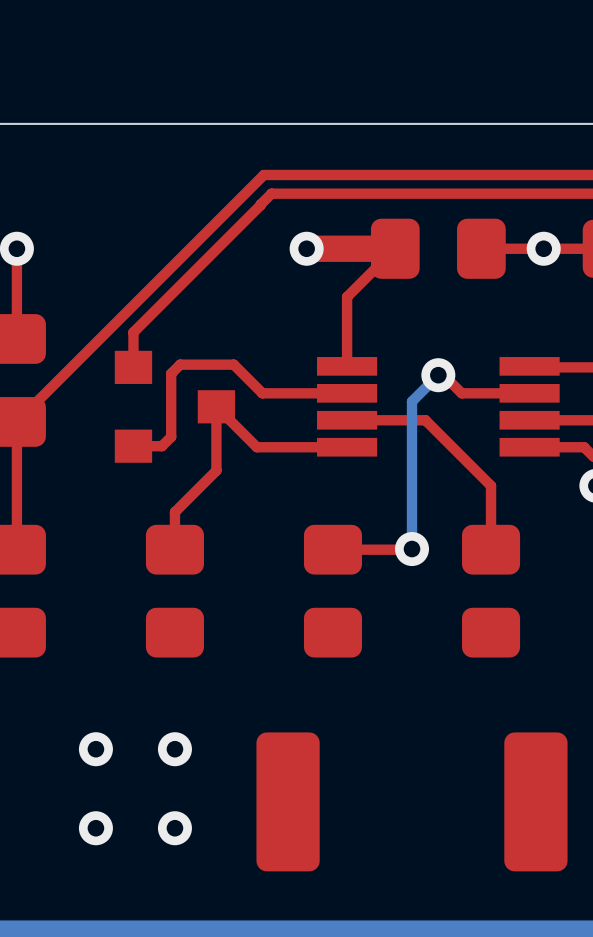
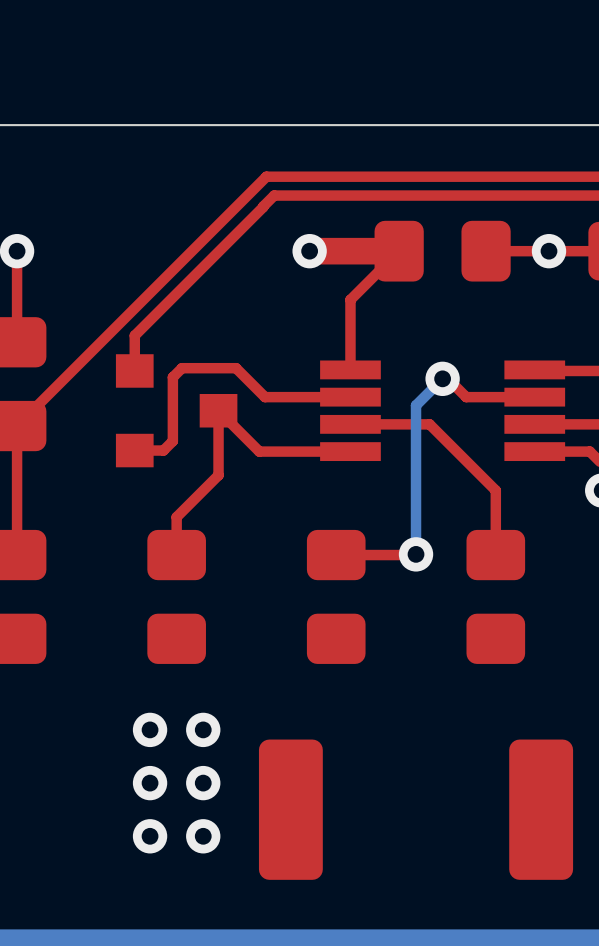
via: none -> (150, 729)
via: none -> (203, 729)
via: (95, 749) -> none
via: (174, 749) -> none
via: none -> (150, 783)
via: none -> (203, 783)
via: (95, 828) -> none
via: none -> (150, 836)
via: (174, 828) -> none
via: none -> (203, 836)

